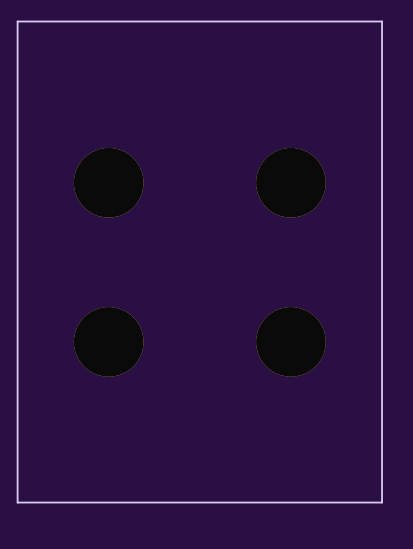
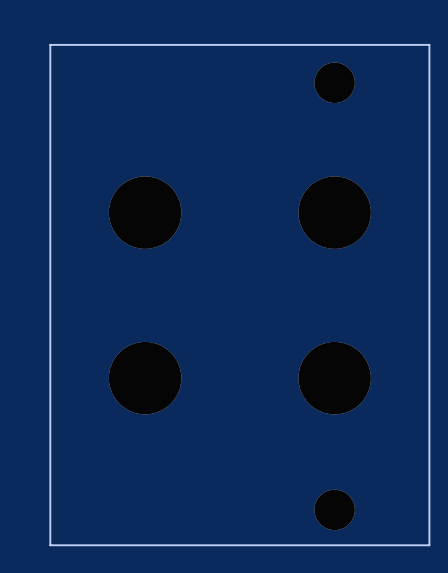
part: none -> (334, 82)
part: none -> (334, 509)

